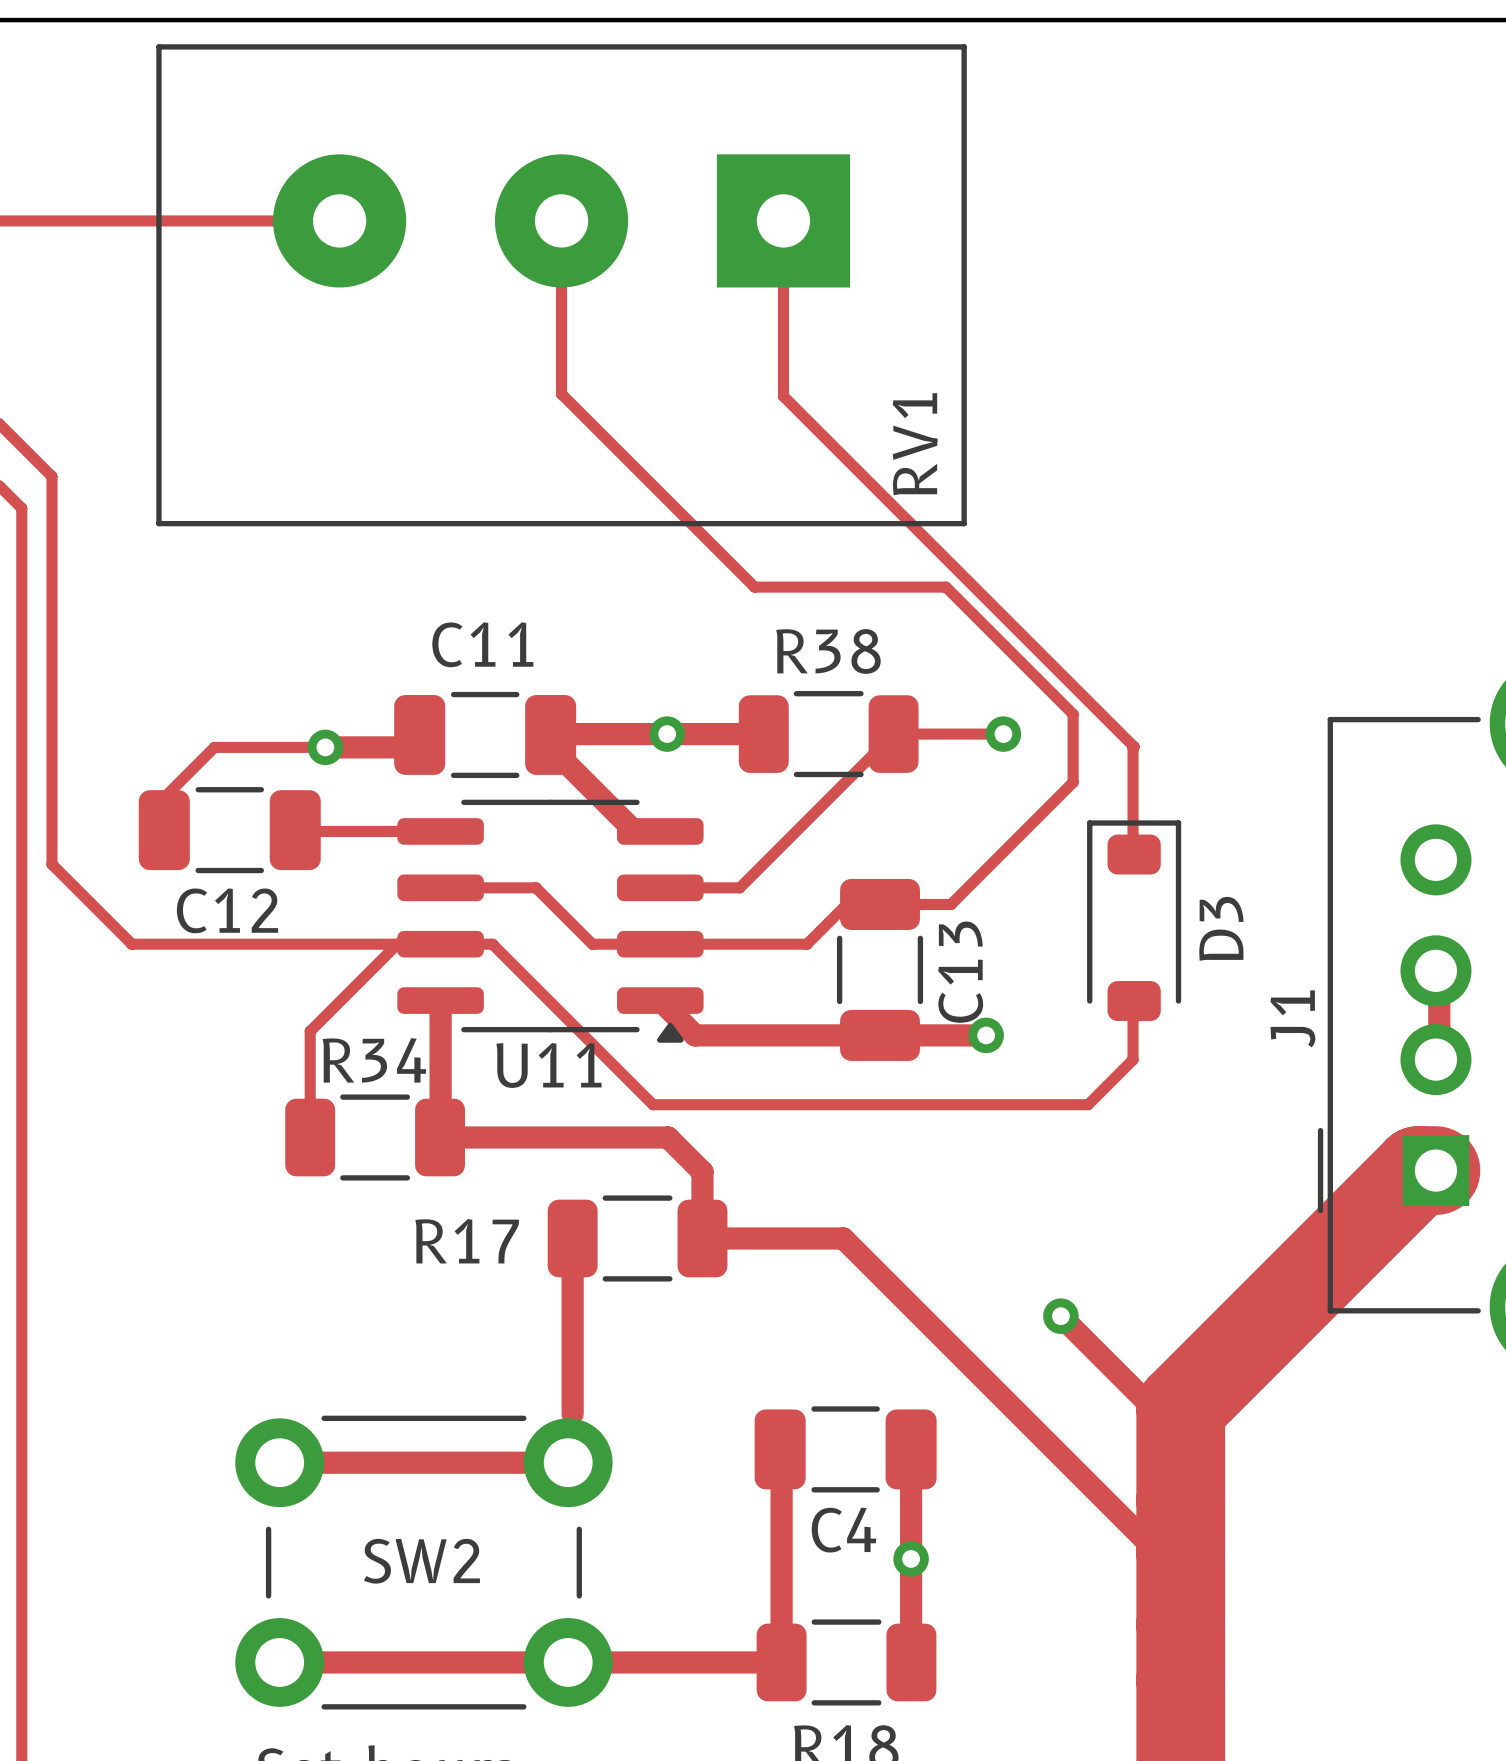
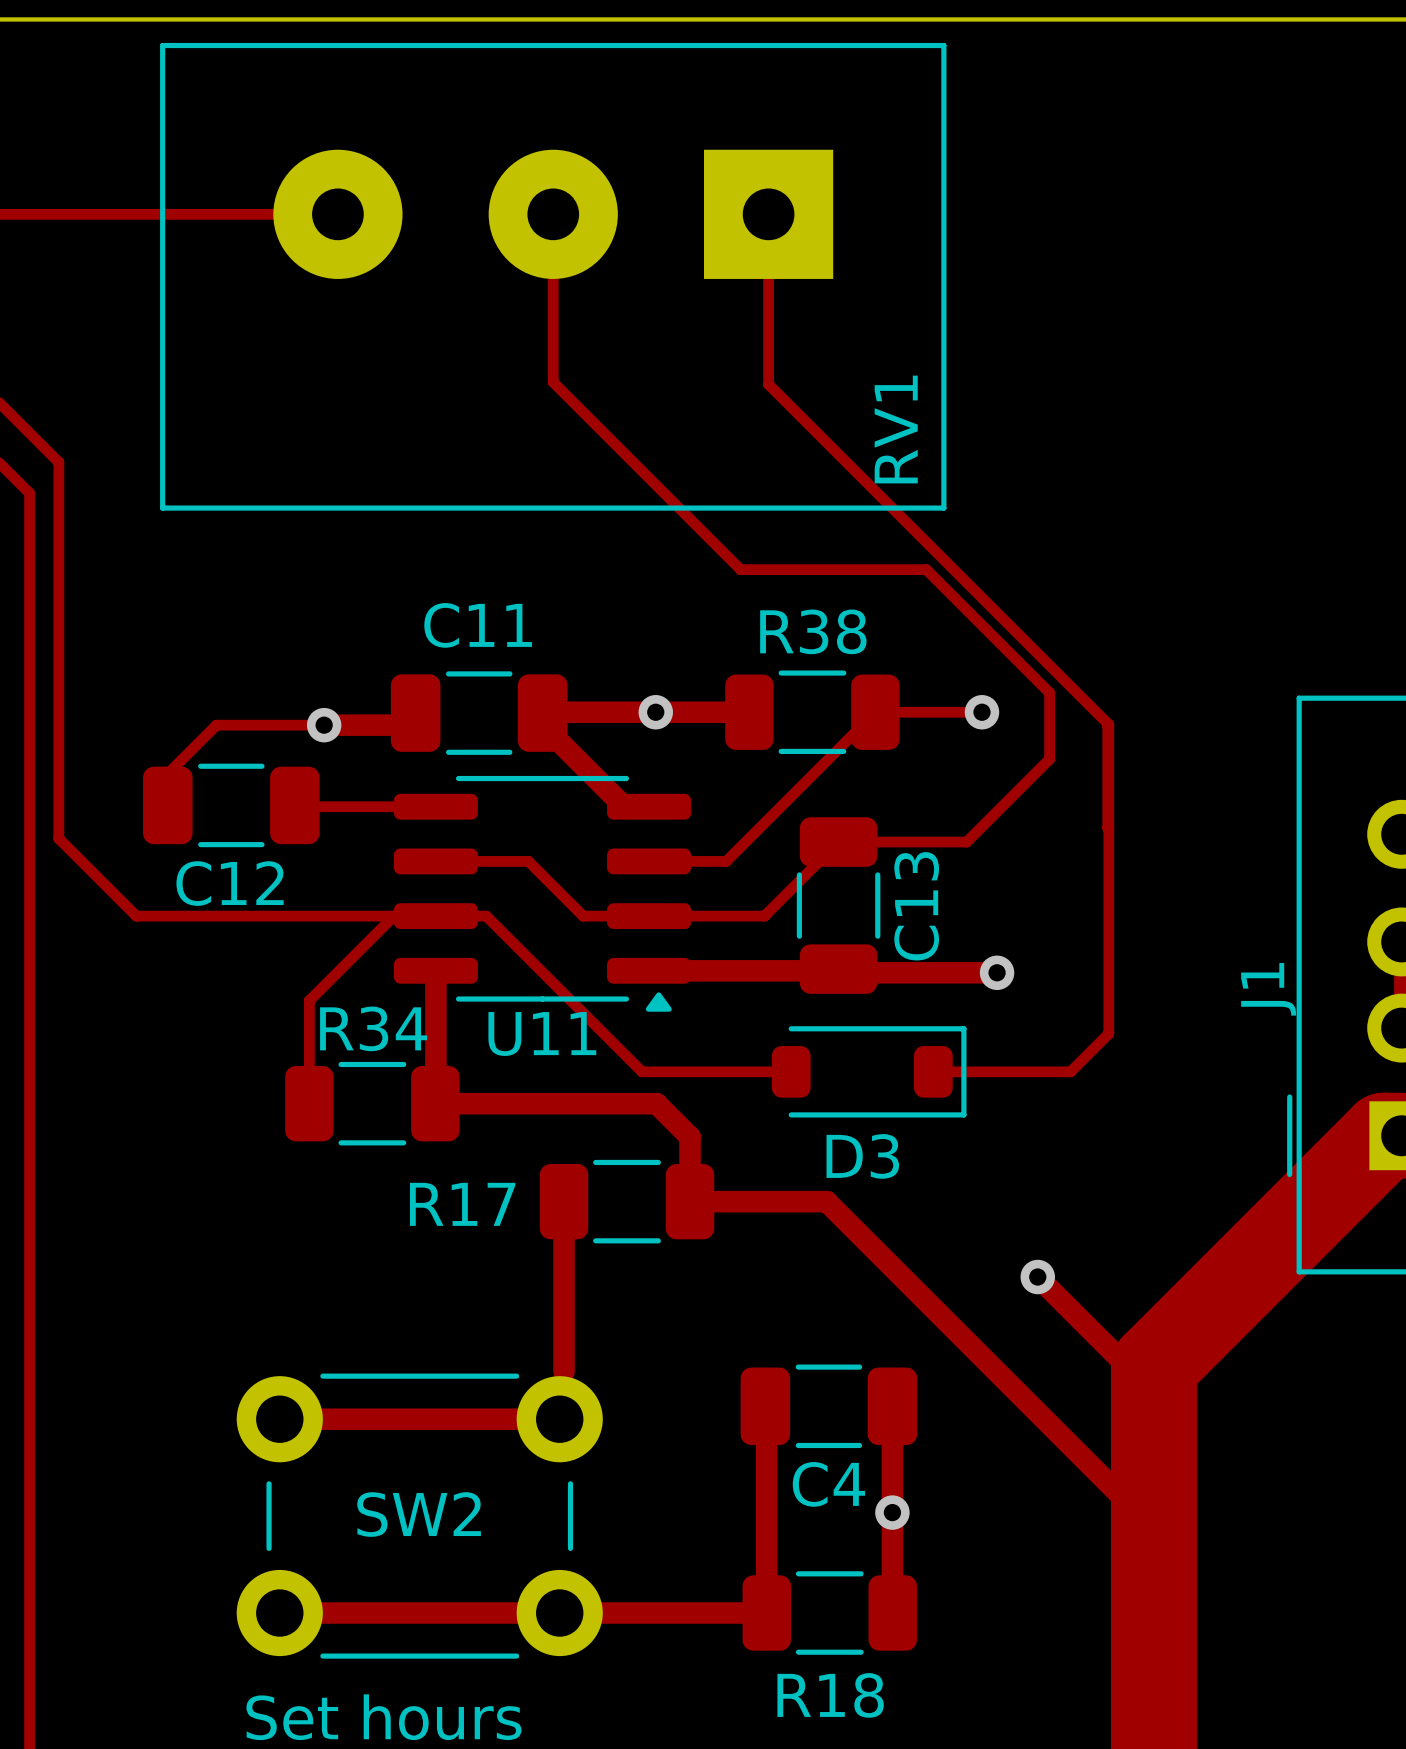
track: none -> (839, 840) (764, 916)
track: (987, 867) (951, 904) (846, 904) (807, 944) (779, 944) -> (966, 842) (838, 842)
D3 rotation: 0° (1134, 920) -> 90° clockwise (869, 1071)
D3 position: (1134, 920) -> (869, 1071)
C13 position: (880, 969) -> (838, 905)
track: (660, 1000) (695, 1035) (871, 1035) (880, 1026) (880, 1035) (986, 1035) -> (649, 970) (836, 970) (838, 969) (842, 972) (997, 972)
track: (1134, 1001) (1133, 1059) (1088, 1104) -> (1108, 724) (1108, 1033) (1070, 1071) (1064, 1071)
via position: (986, 1035) -> (997, 972)
track: (806, 1104) (953, 1104) -> none

